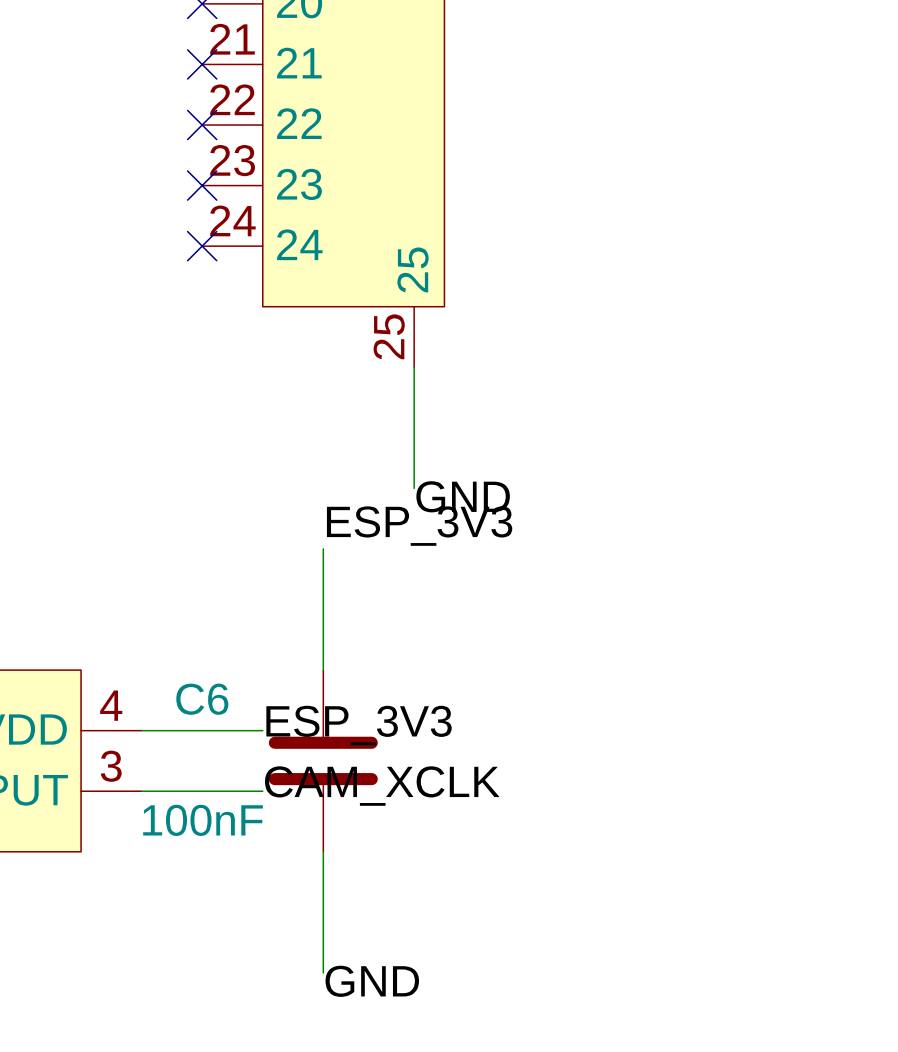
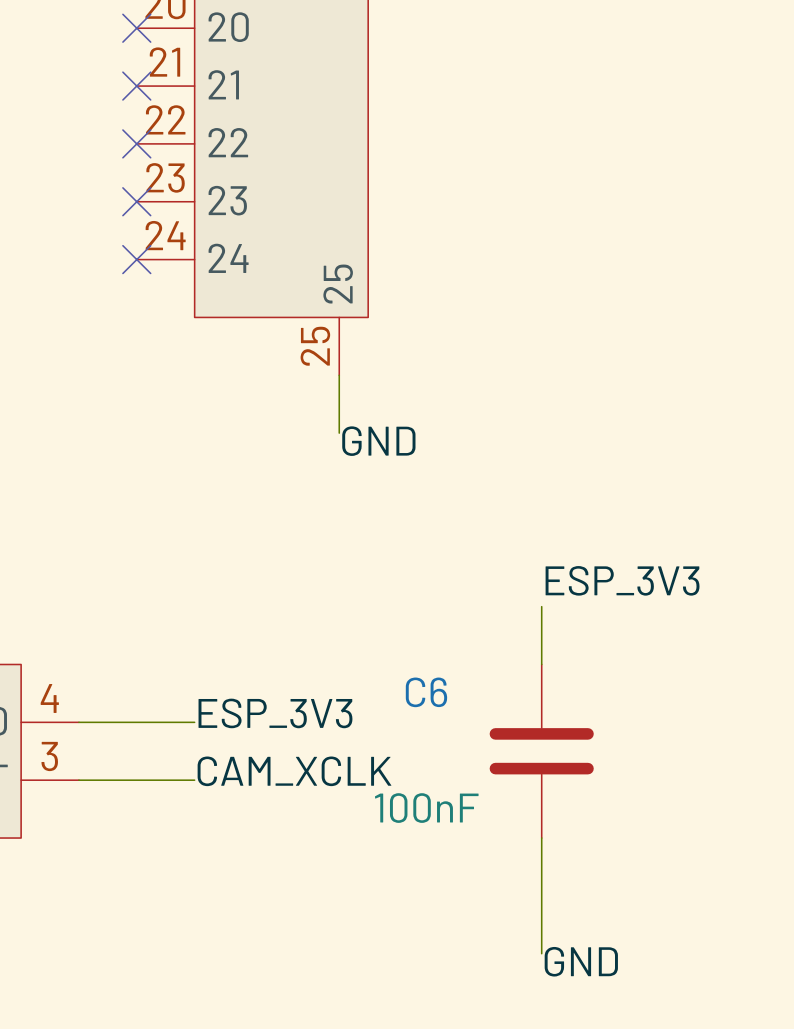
wire: (414, 427) (414, 488) -> (541, 606) (541, 664)
label position: GND (463, 496) -> GND (378, 441)
label position: ESP_3V3 (419, 526) -> ESP_3V3 (622, 580)
wire: (323, 548) (323, 670) -> none
C6 position: (323, 760) -> (541, 751)
wire: (323, 851) (323, 972) -> (541, 838) (541, 953)
label: GND (372, 981) -> none
label: none -> GND (581, 961)

